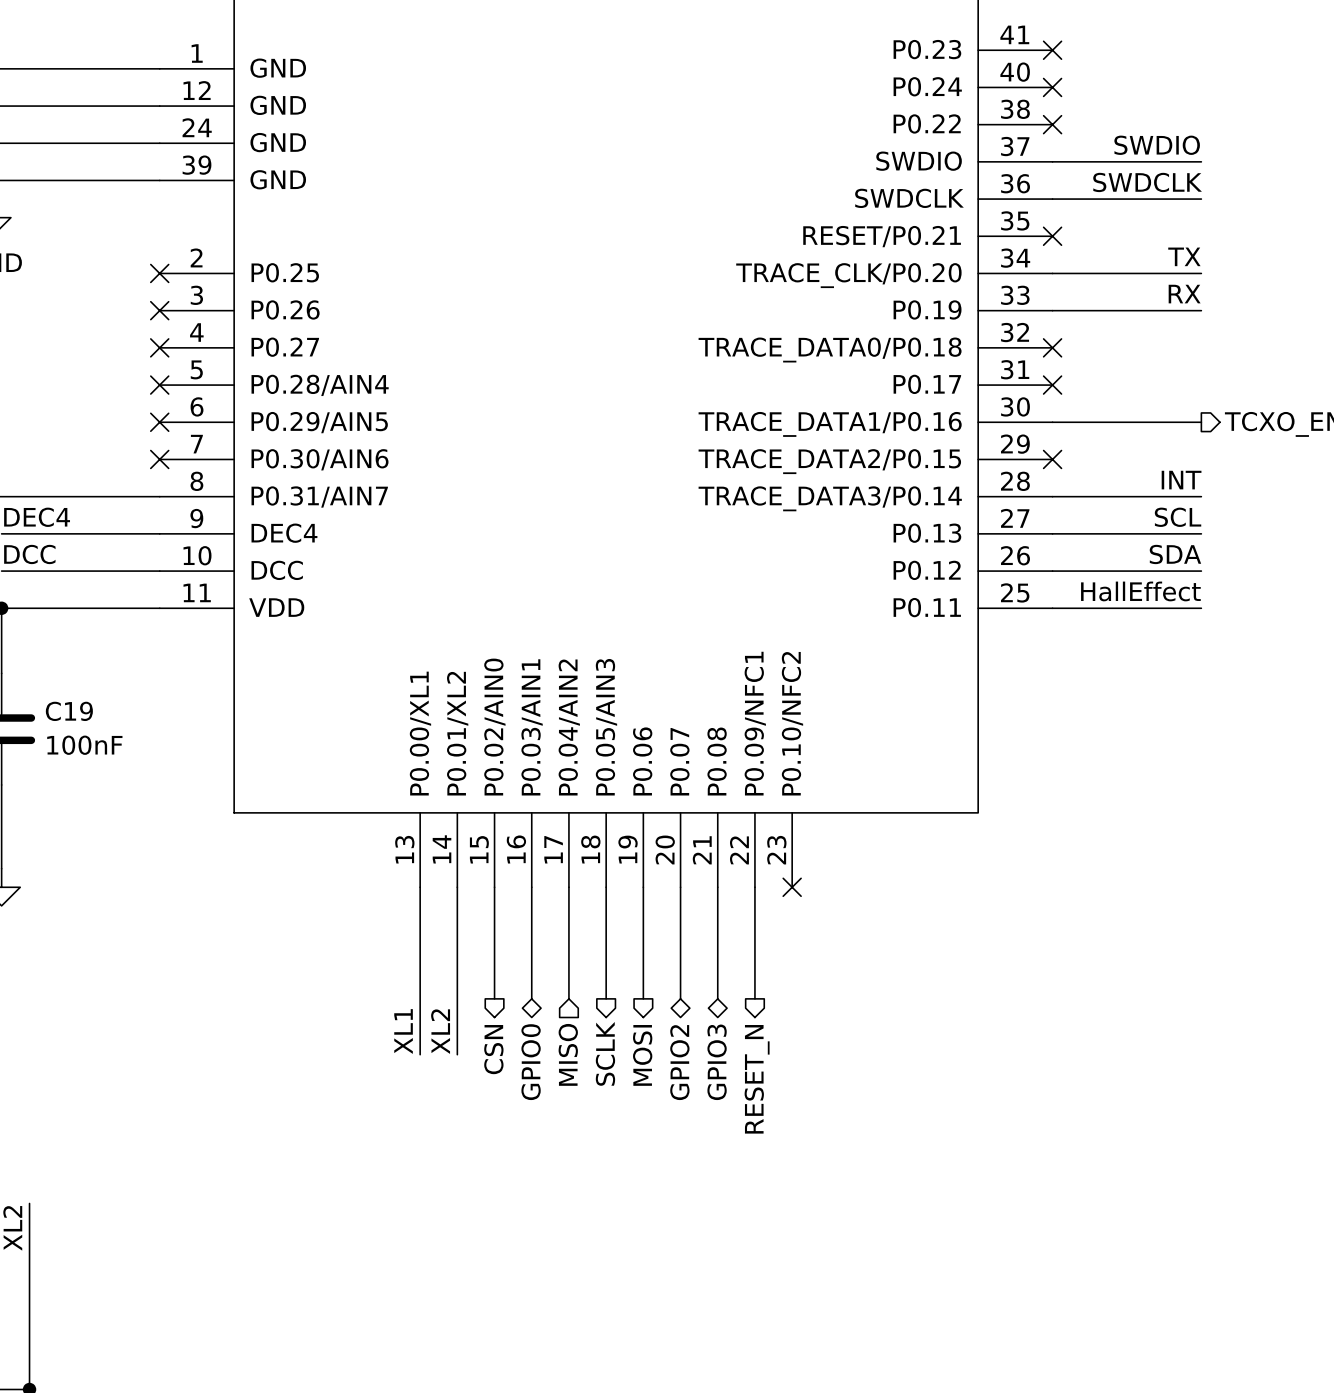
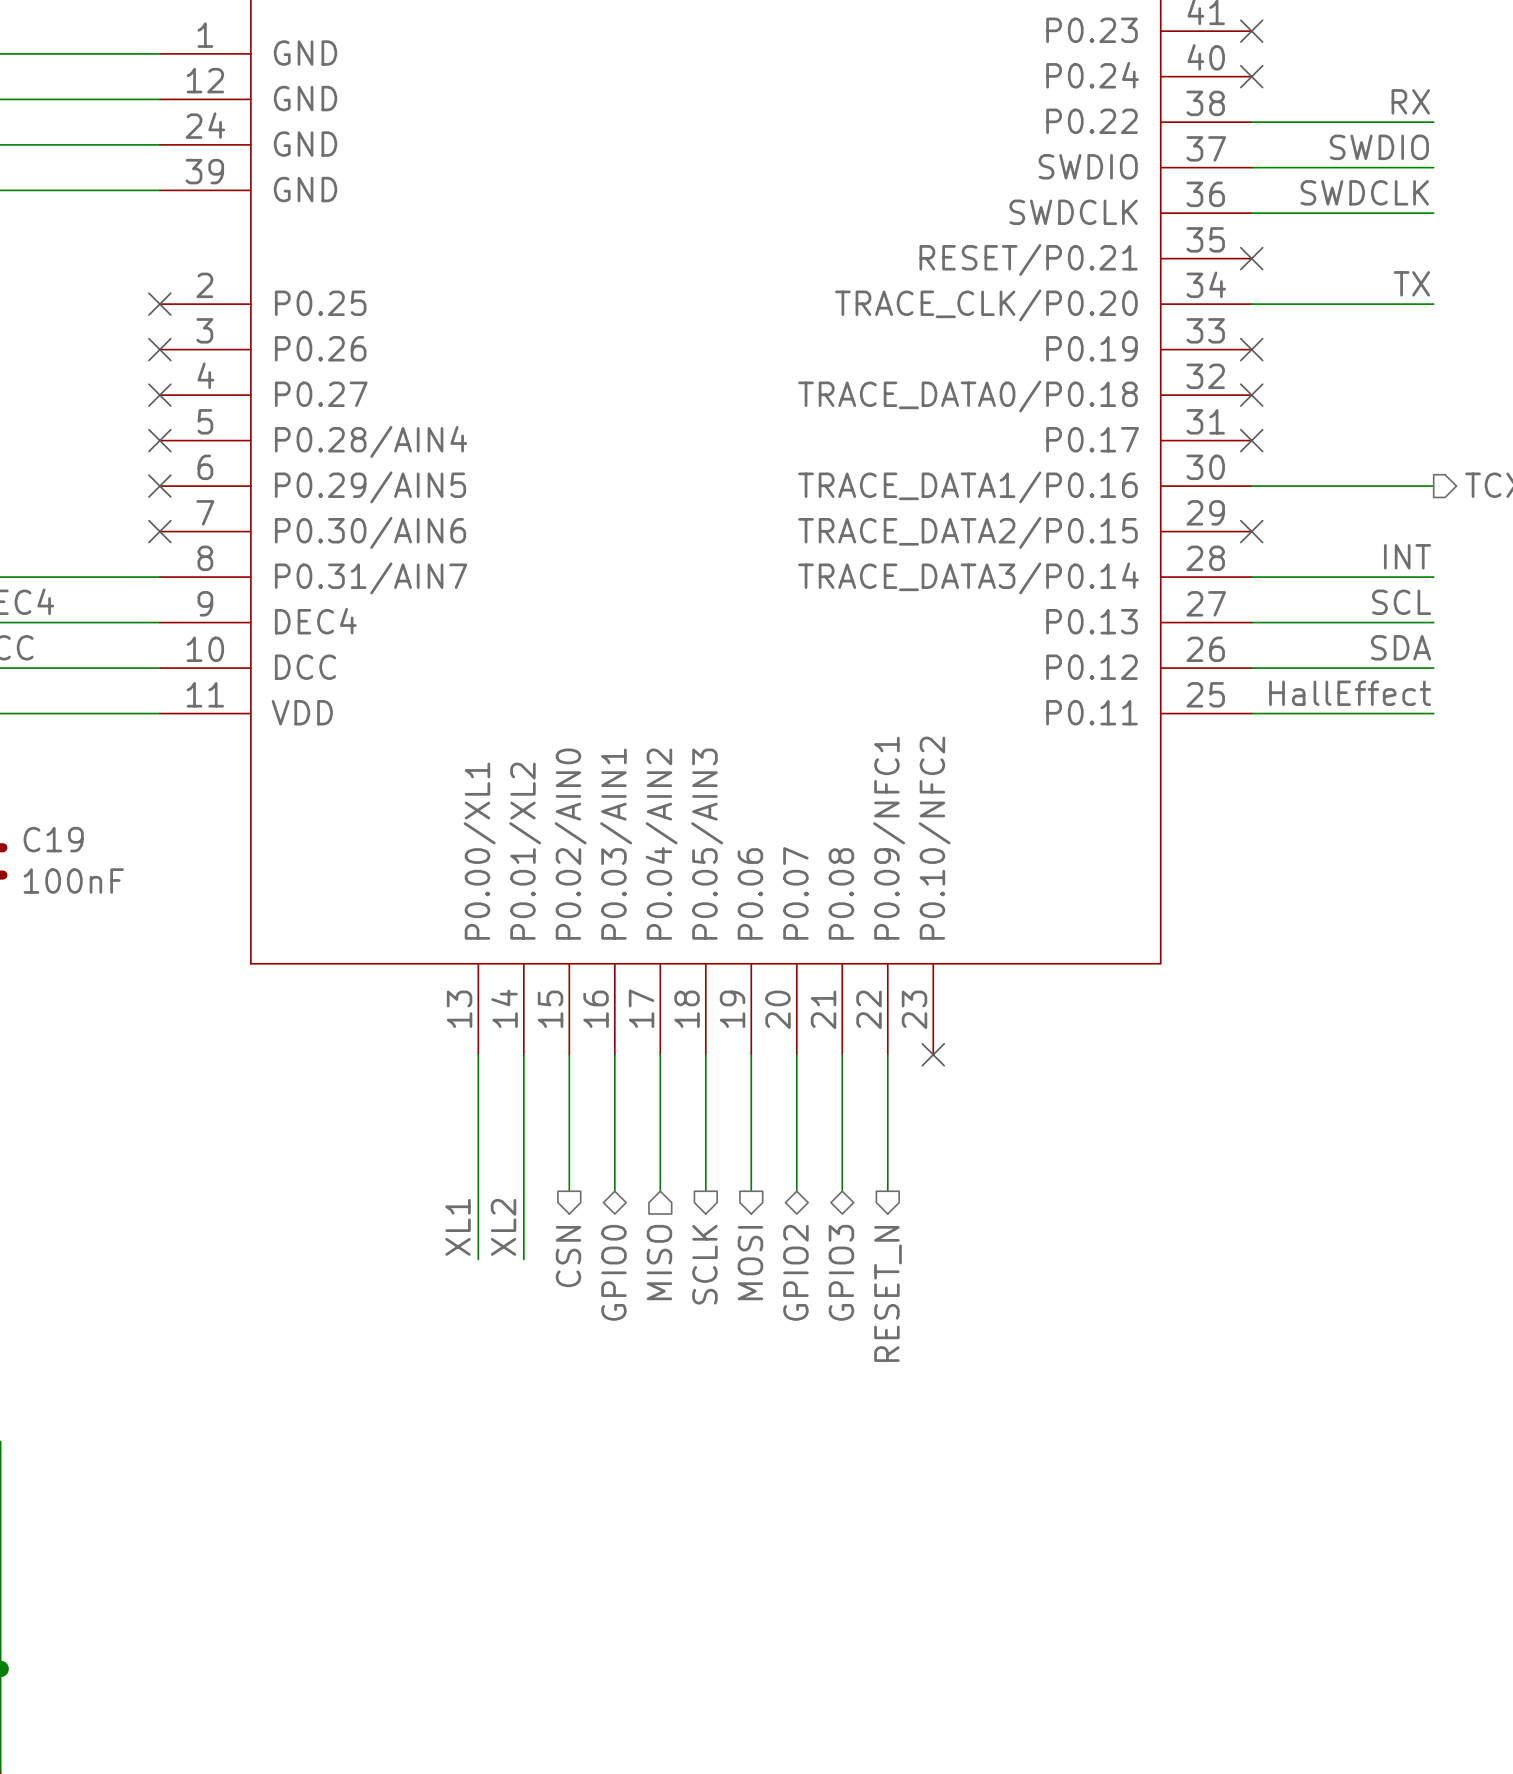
no-connect mark: (1052, 124) -> none
label position: RX (1184, 294) -> RX (1410, 101)
wire: (1052, 310) (1201, 310) -> (1251, 122) (1433, 122)
no-connect mark: none -> (1251, 349)

